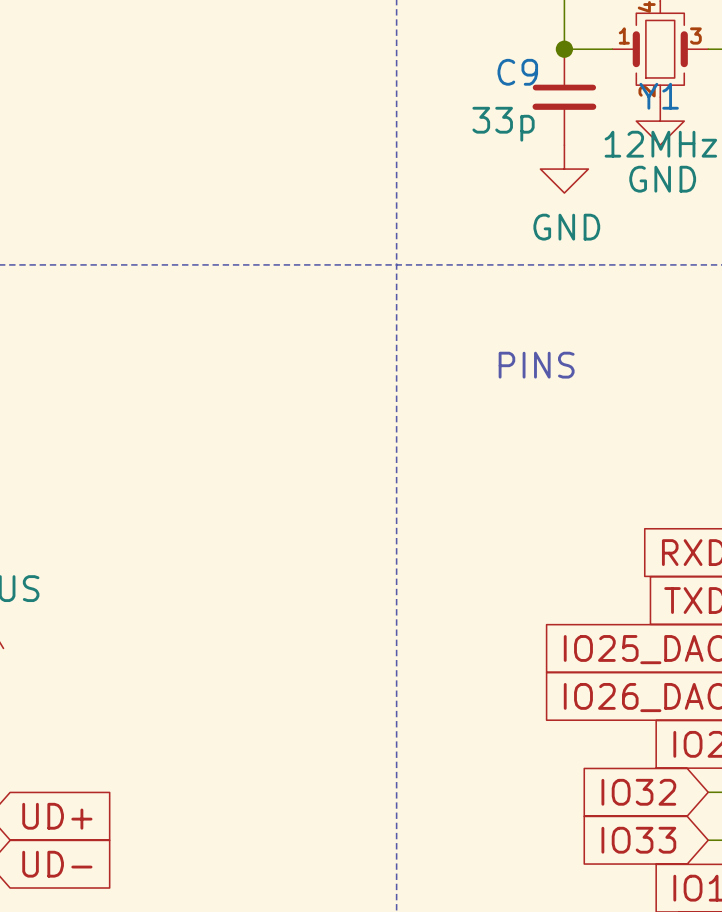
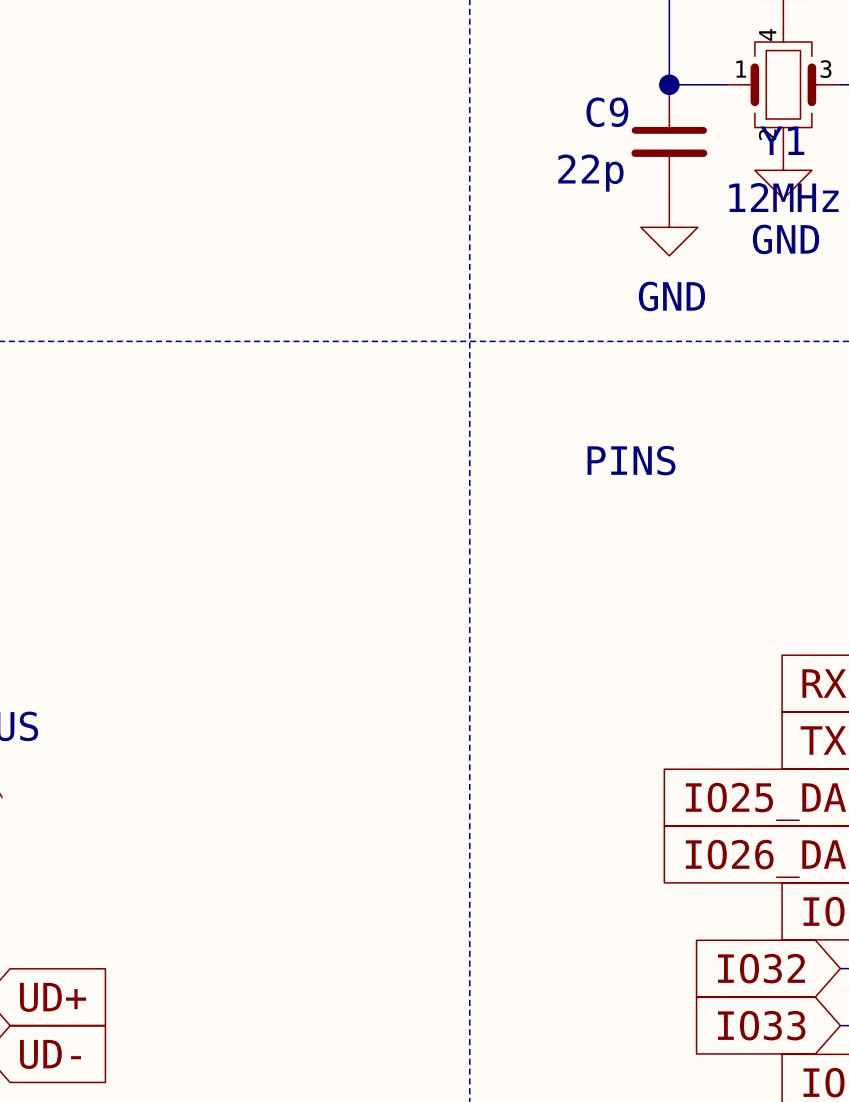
C9 value: 33p (503, 124) -> 22p (590, 173)

